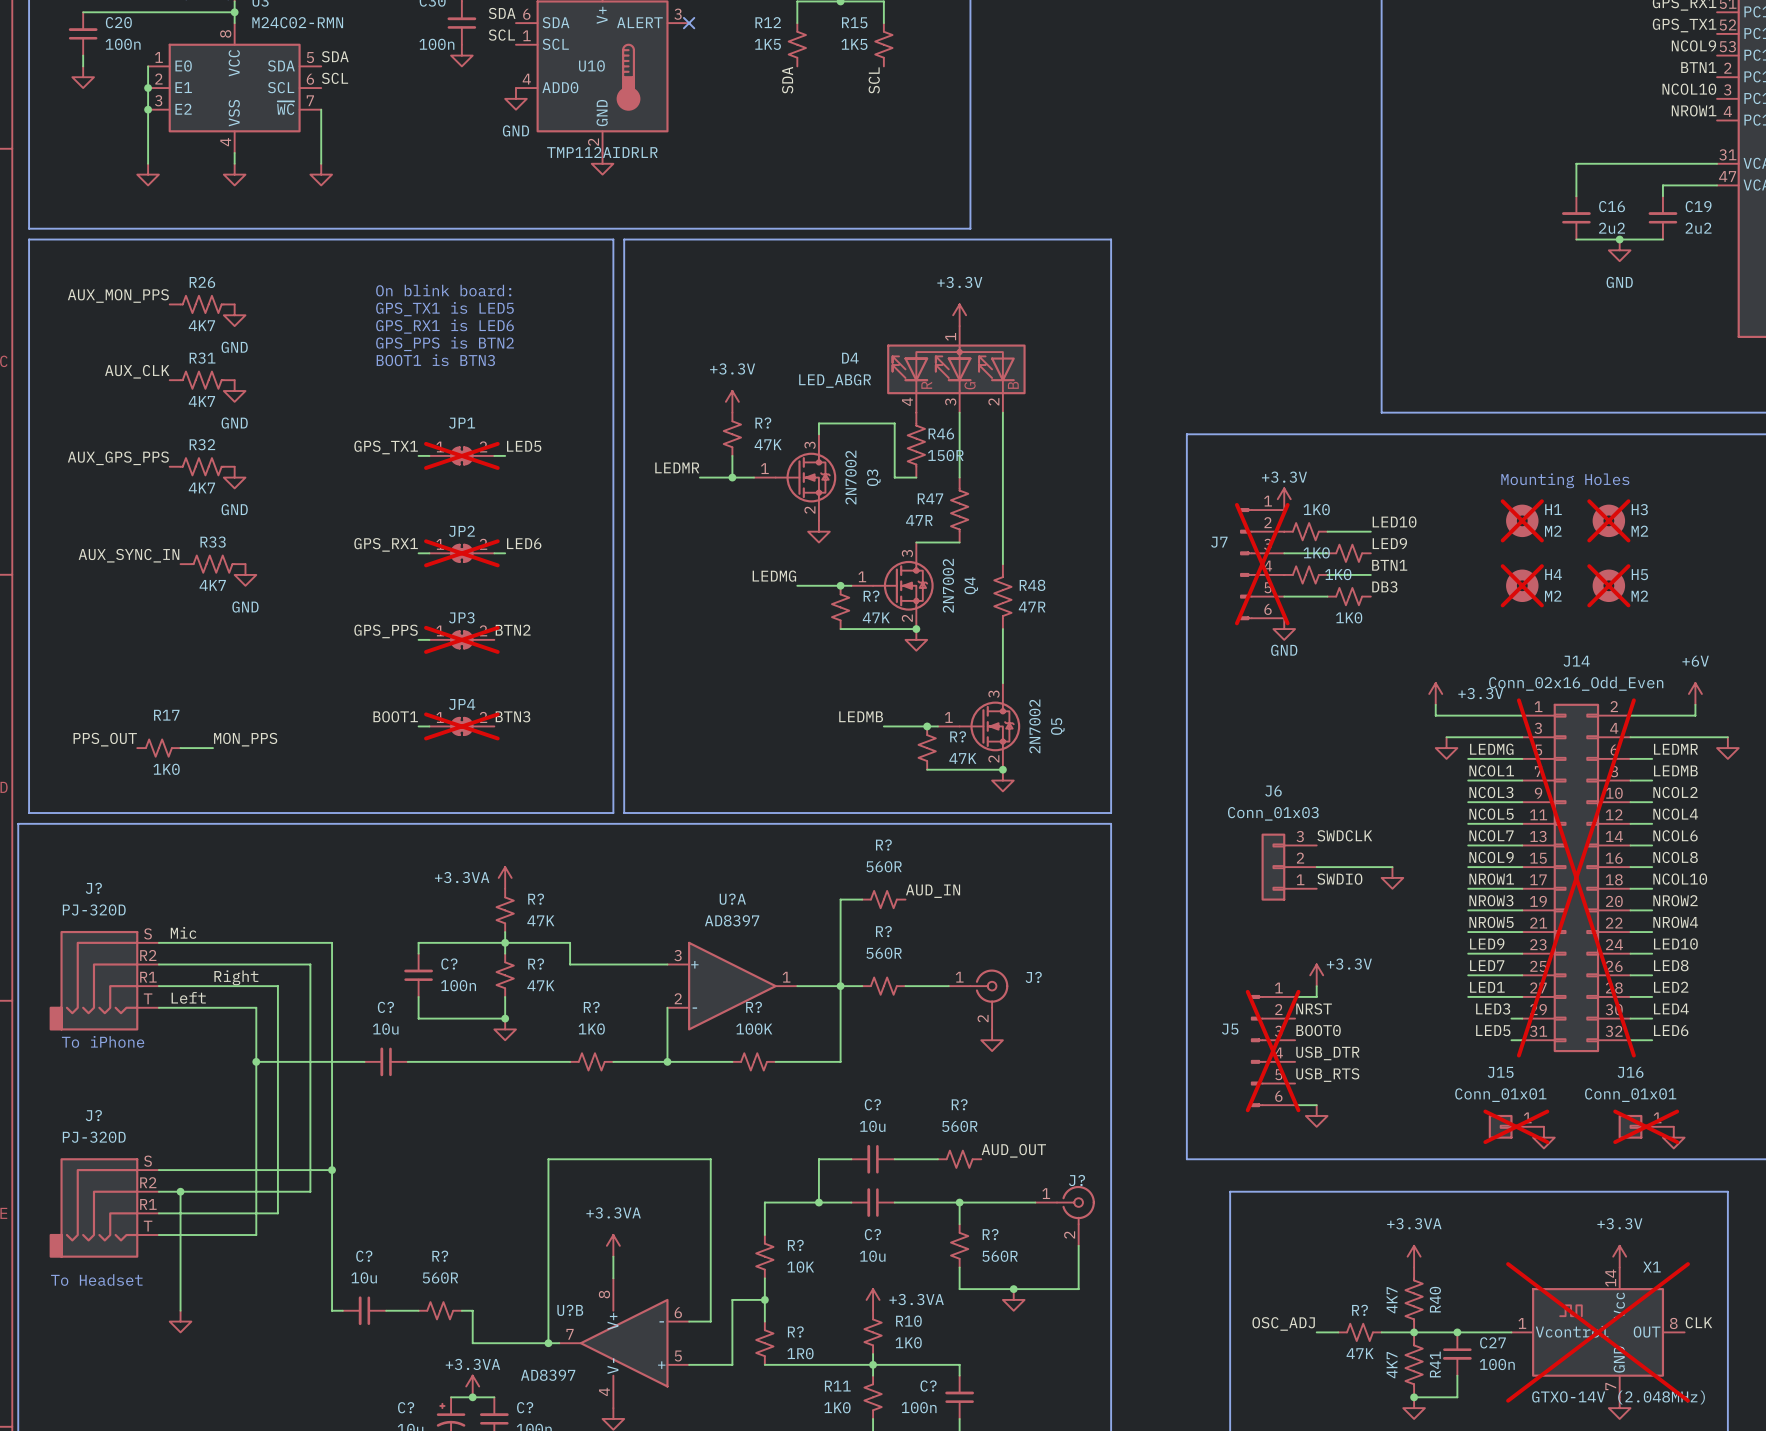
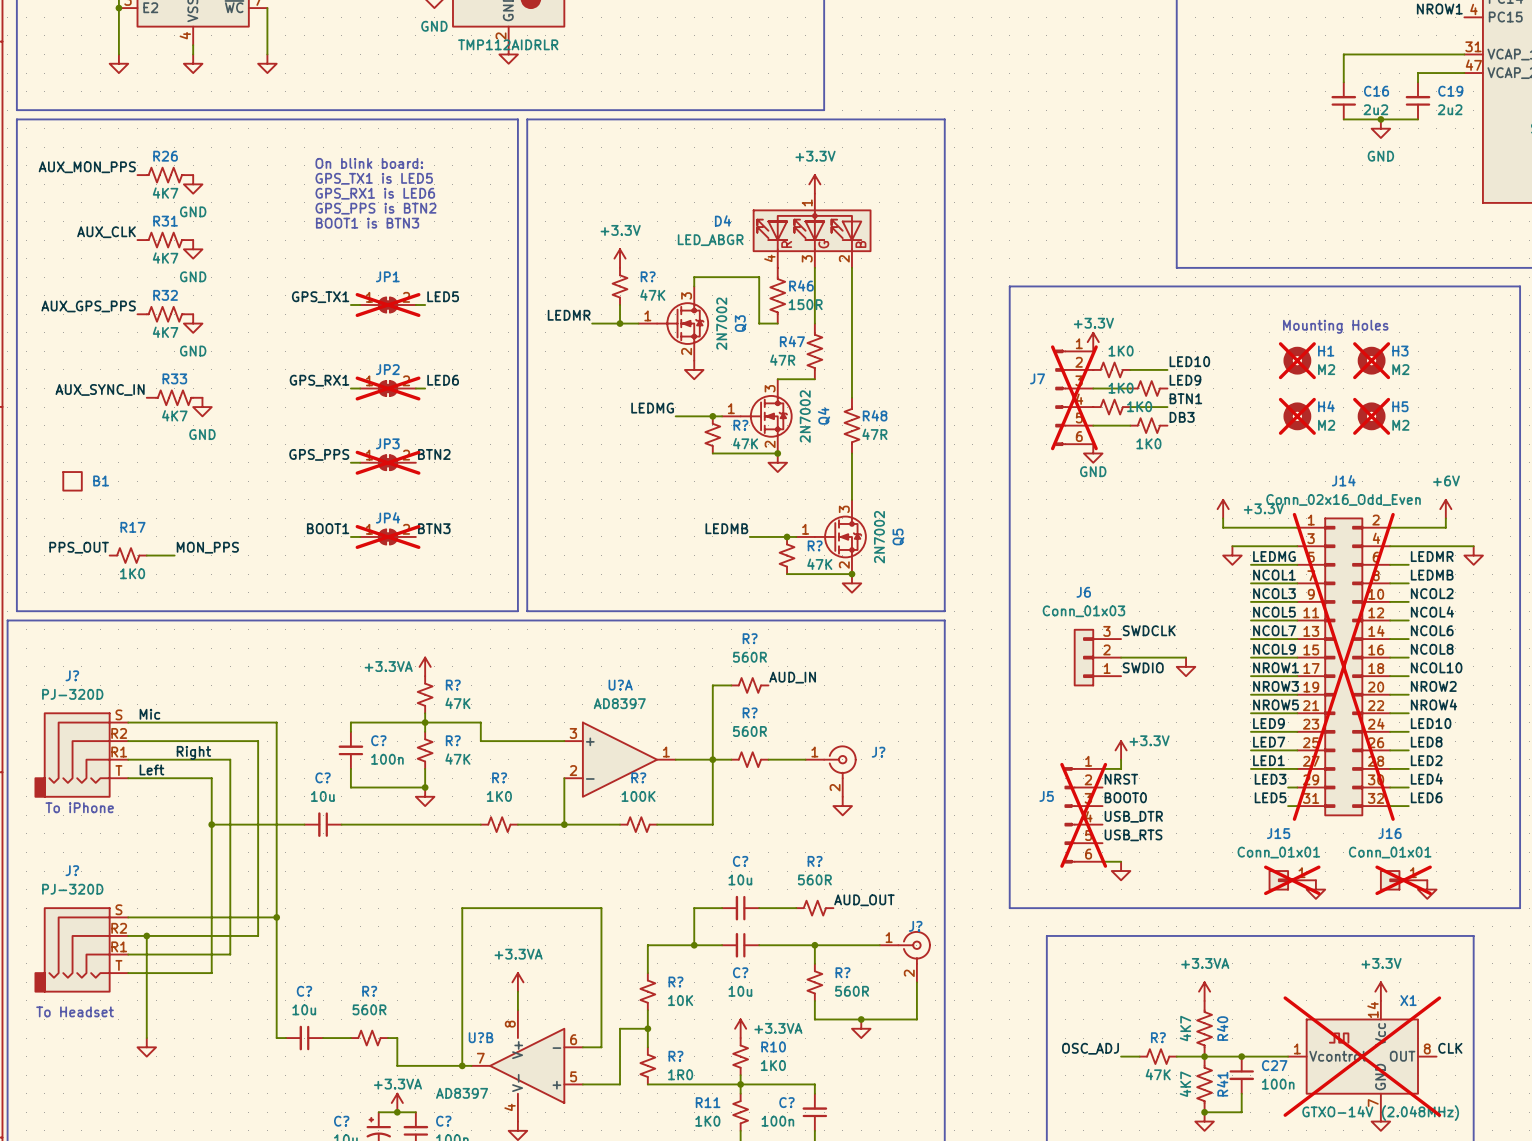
B1: none -> (72, 481)

